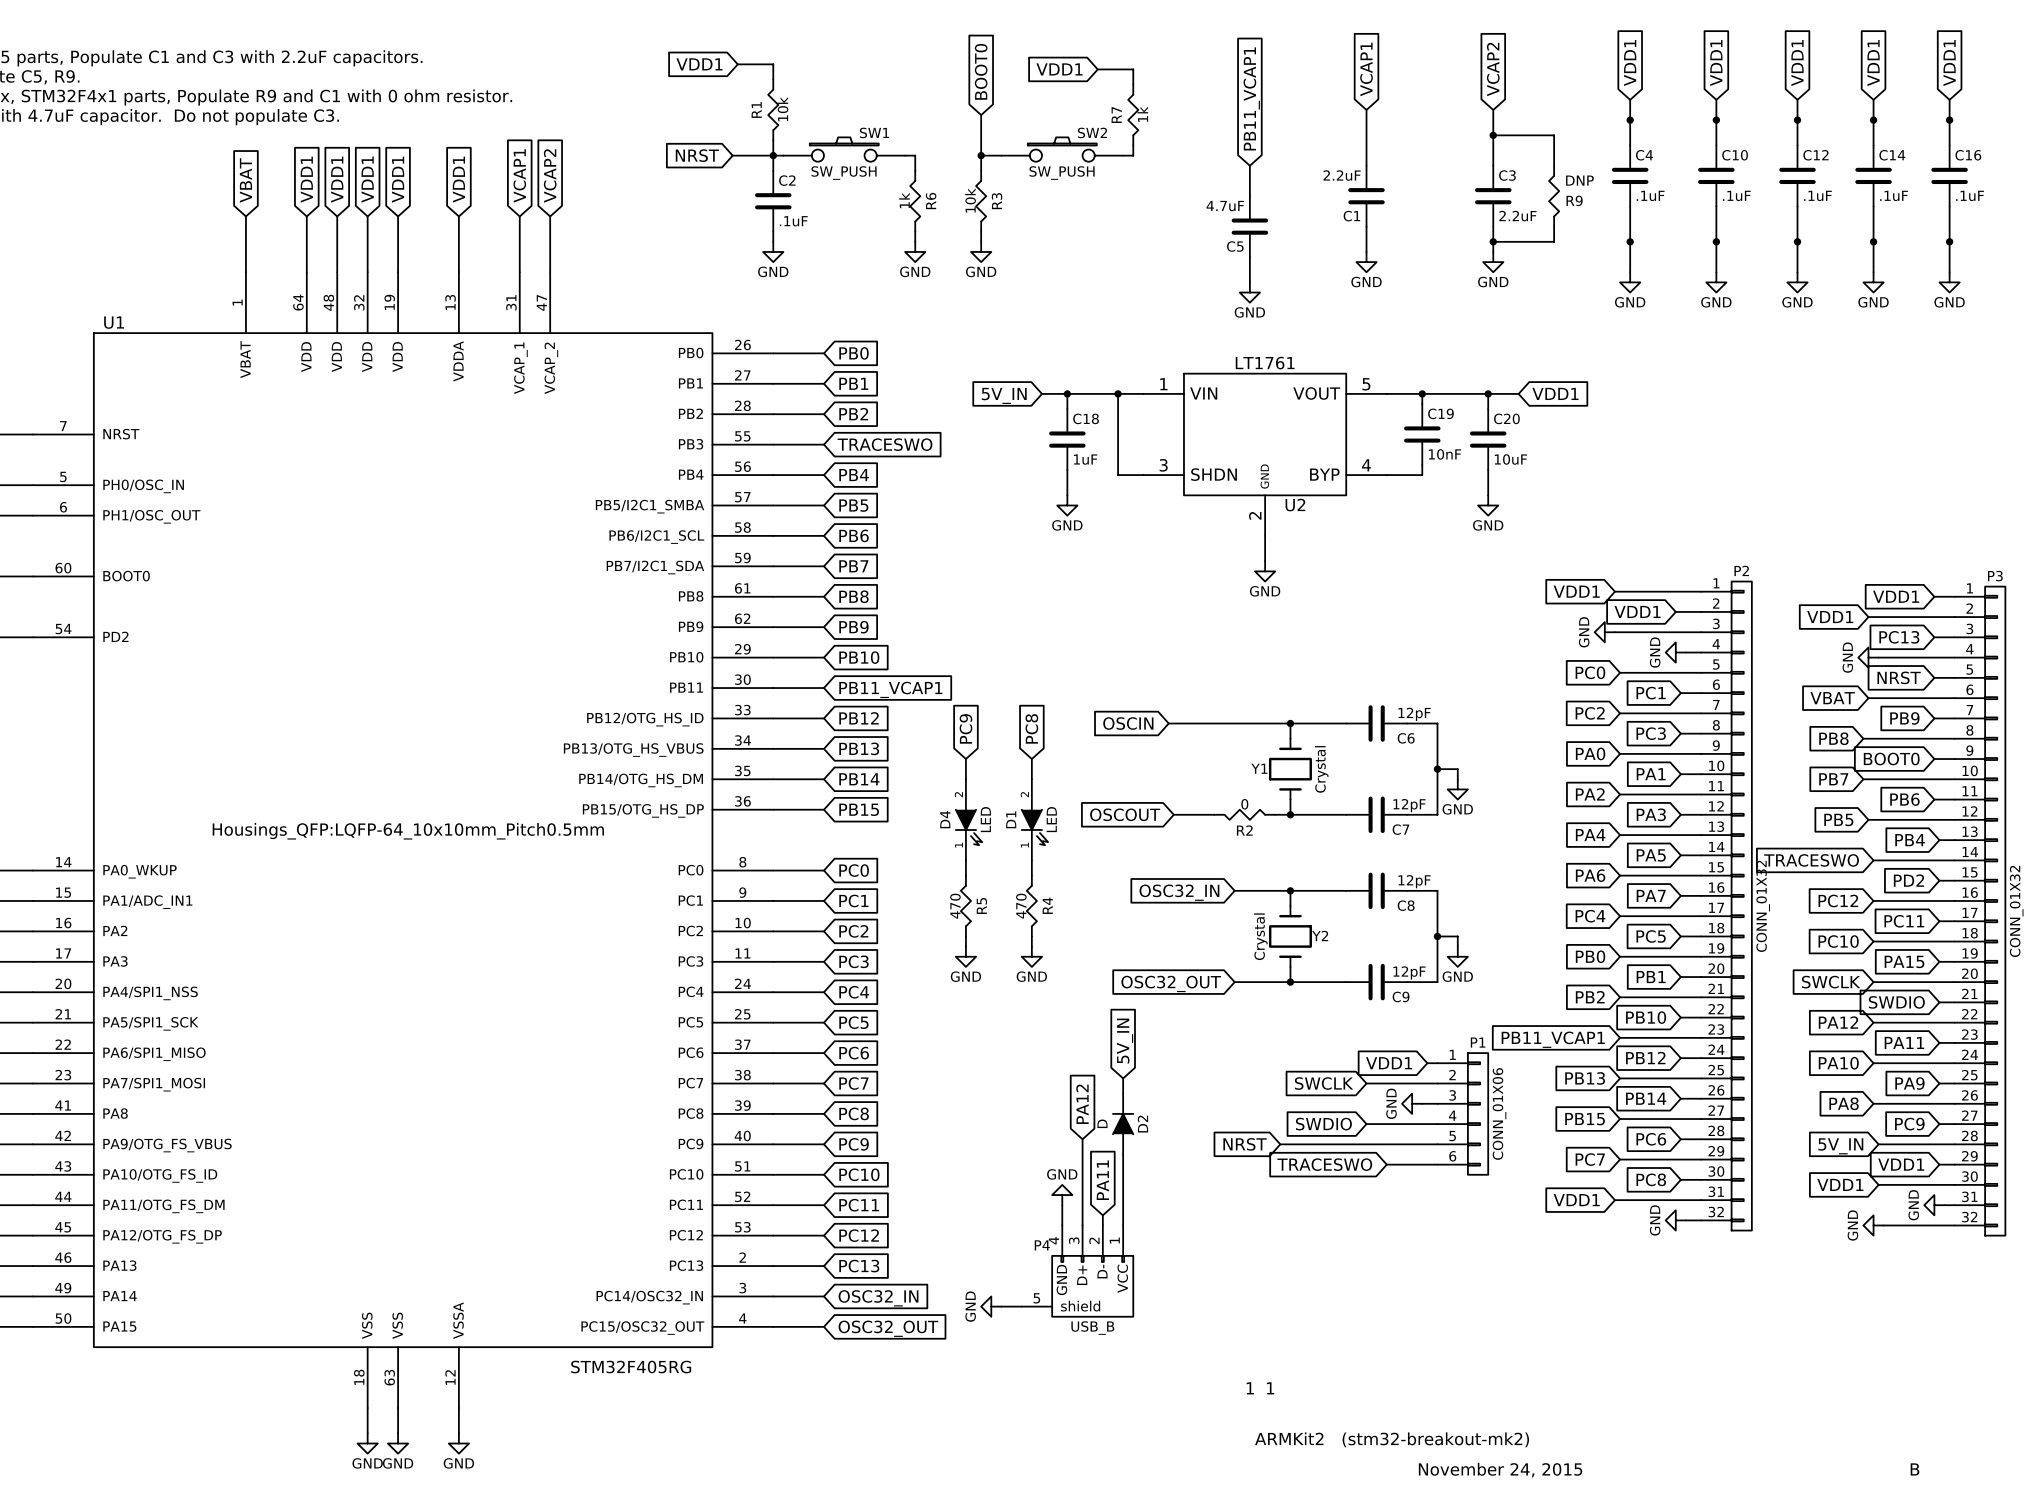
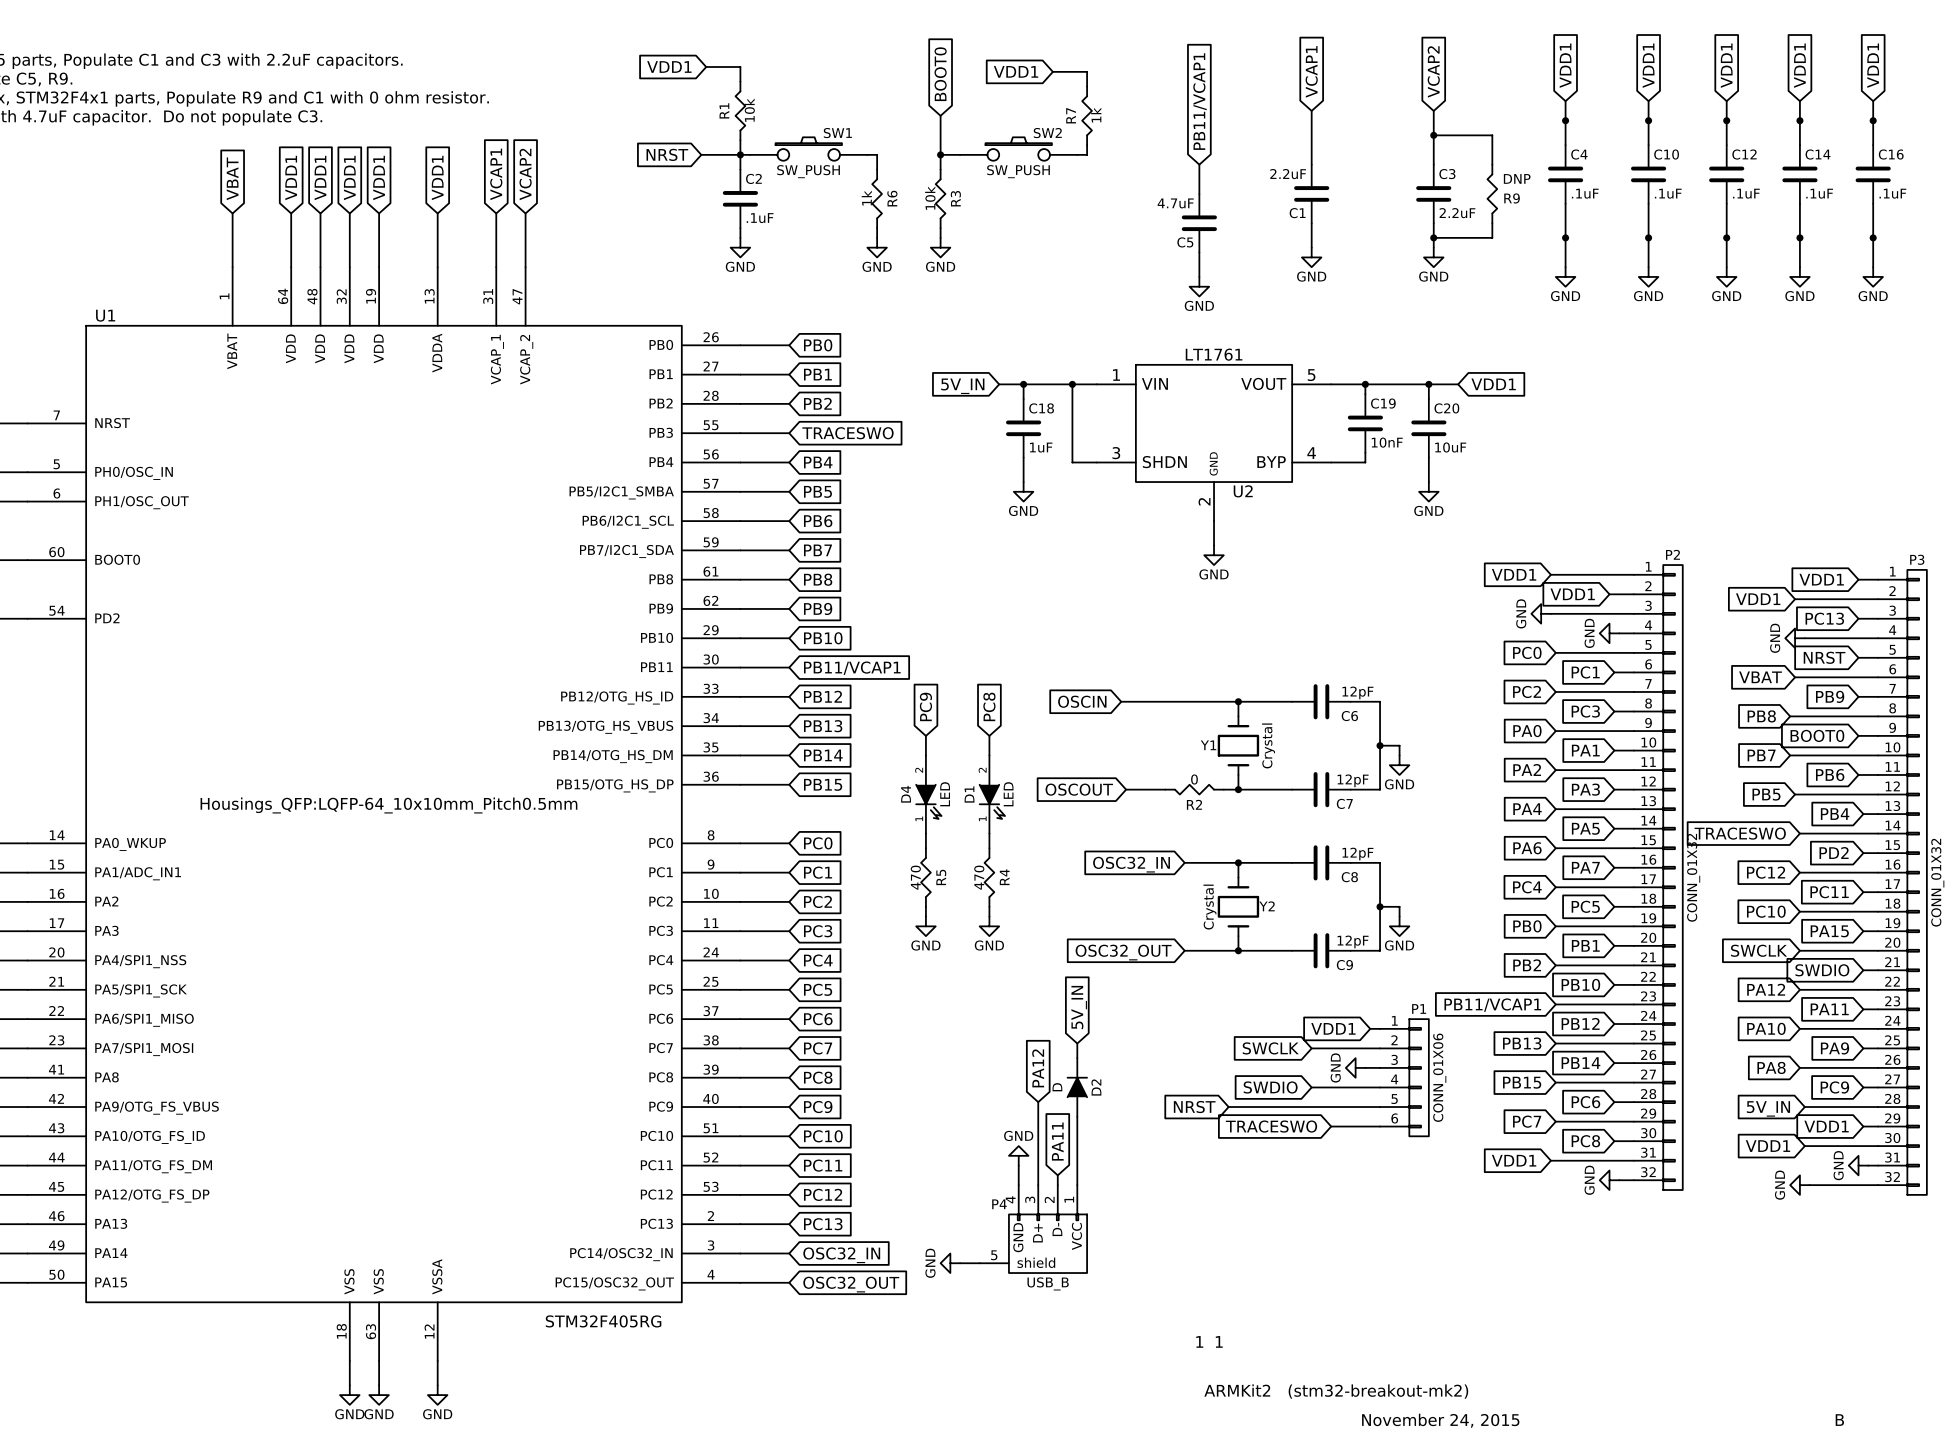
global label: PB11_VCAP1 (1251, 98) -> PB11/VCAP1 (1200, 101)
global label: PB11_VCAP1 (890, 689) -> PB11/VCAP1 (852, 668)
global label: PB11_VCAP1 (1553, 1039) -> PB11/VCAP1 (1492, 1005)

